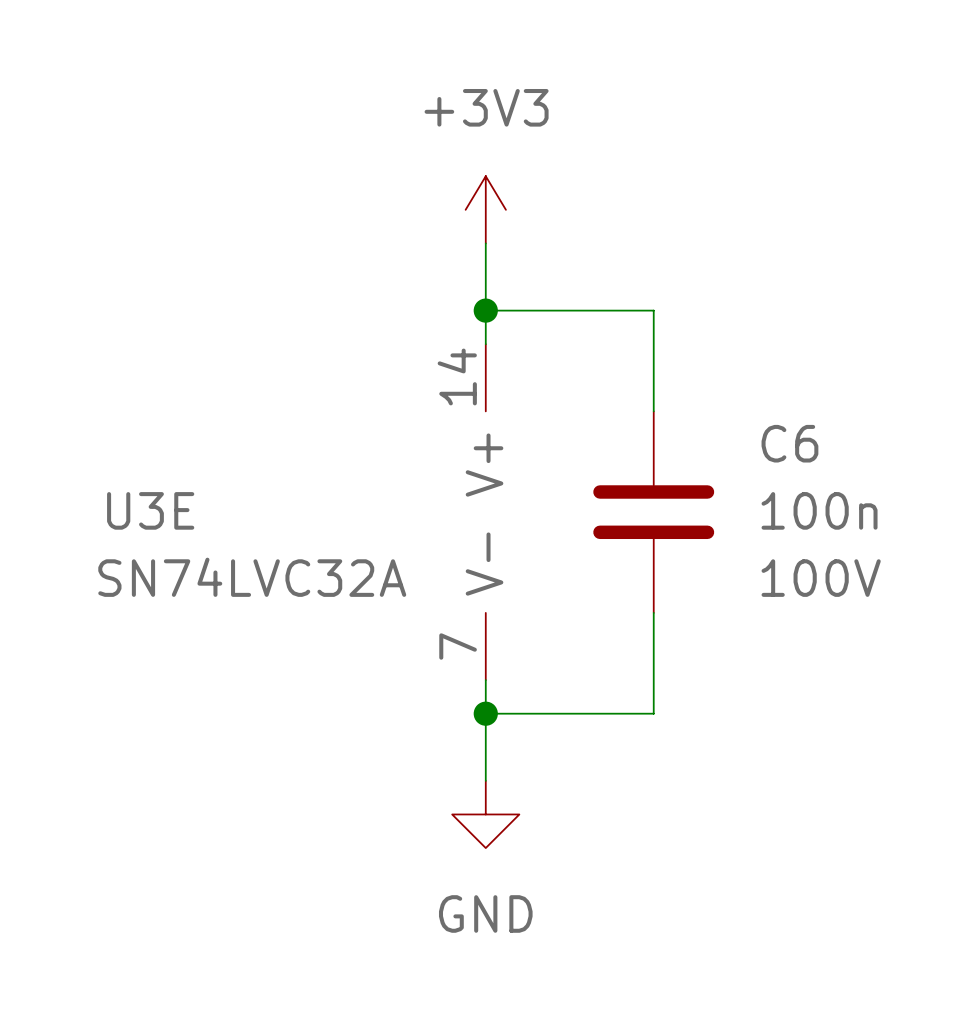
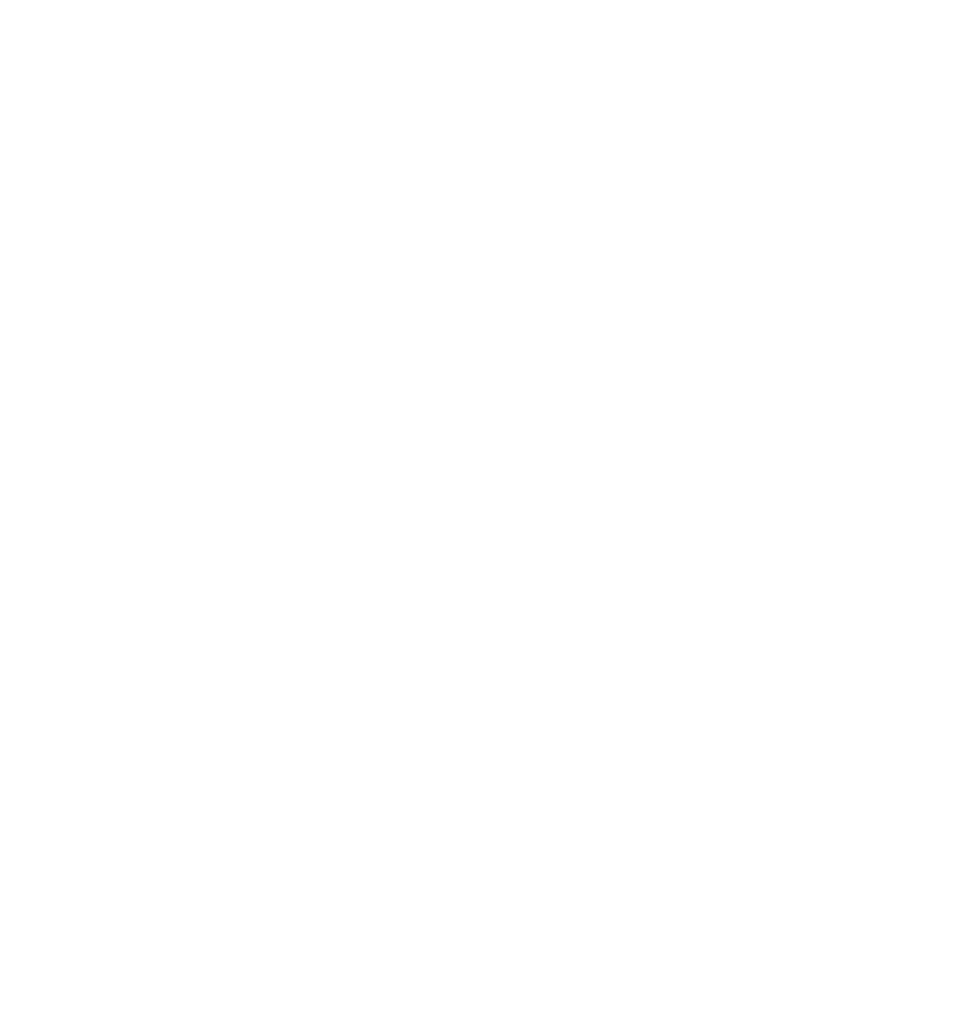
power symbol: +3V3 (485, 209) -> none
wire: (485, 243) (485, 344) -> none
wire: (485, 310) (653, 310) (653, 411) -> none
junction: (485, 310) -> none
U3E: SN74LVC32A (485, 512) -> none
C6: 100n (653, 512) -> none
wire: (653, 612) (653, 713) (485, 713) -> none
wire: (485, 680) (485, 780) -> none
junction: (485, 713) -> none
power symbol: GND (485, 814) -> none

